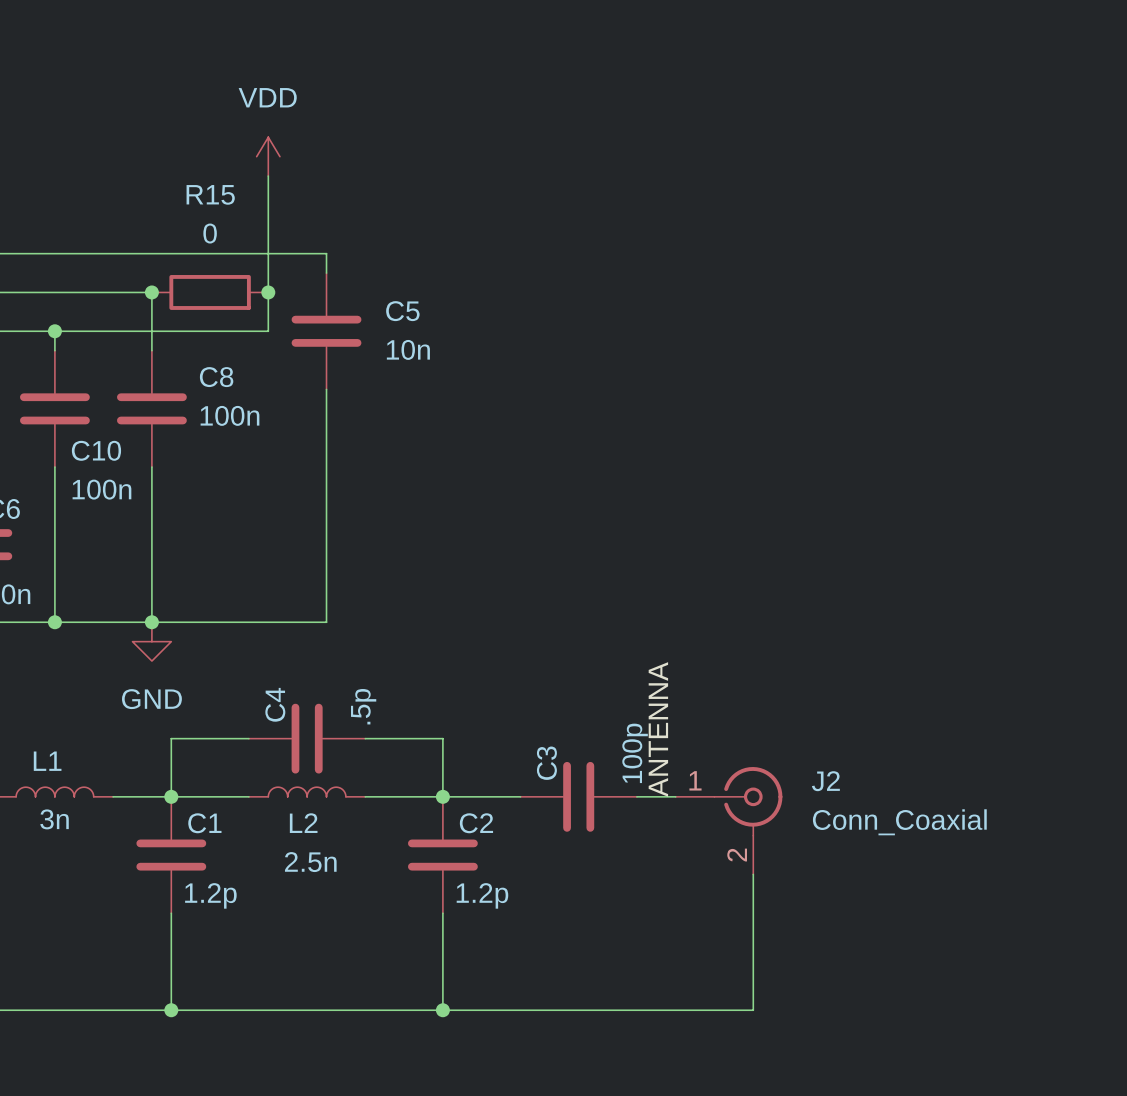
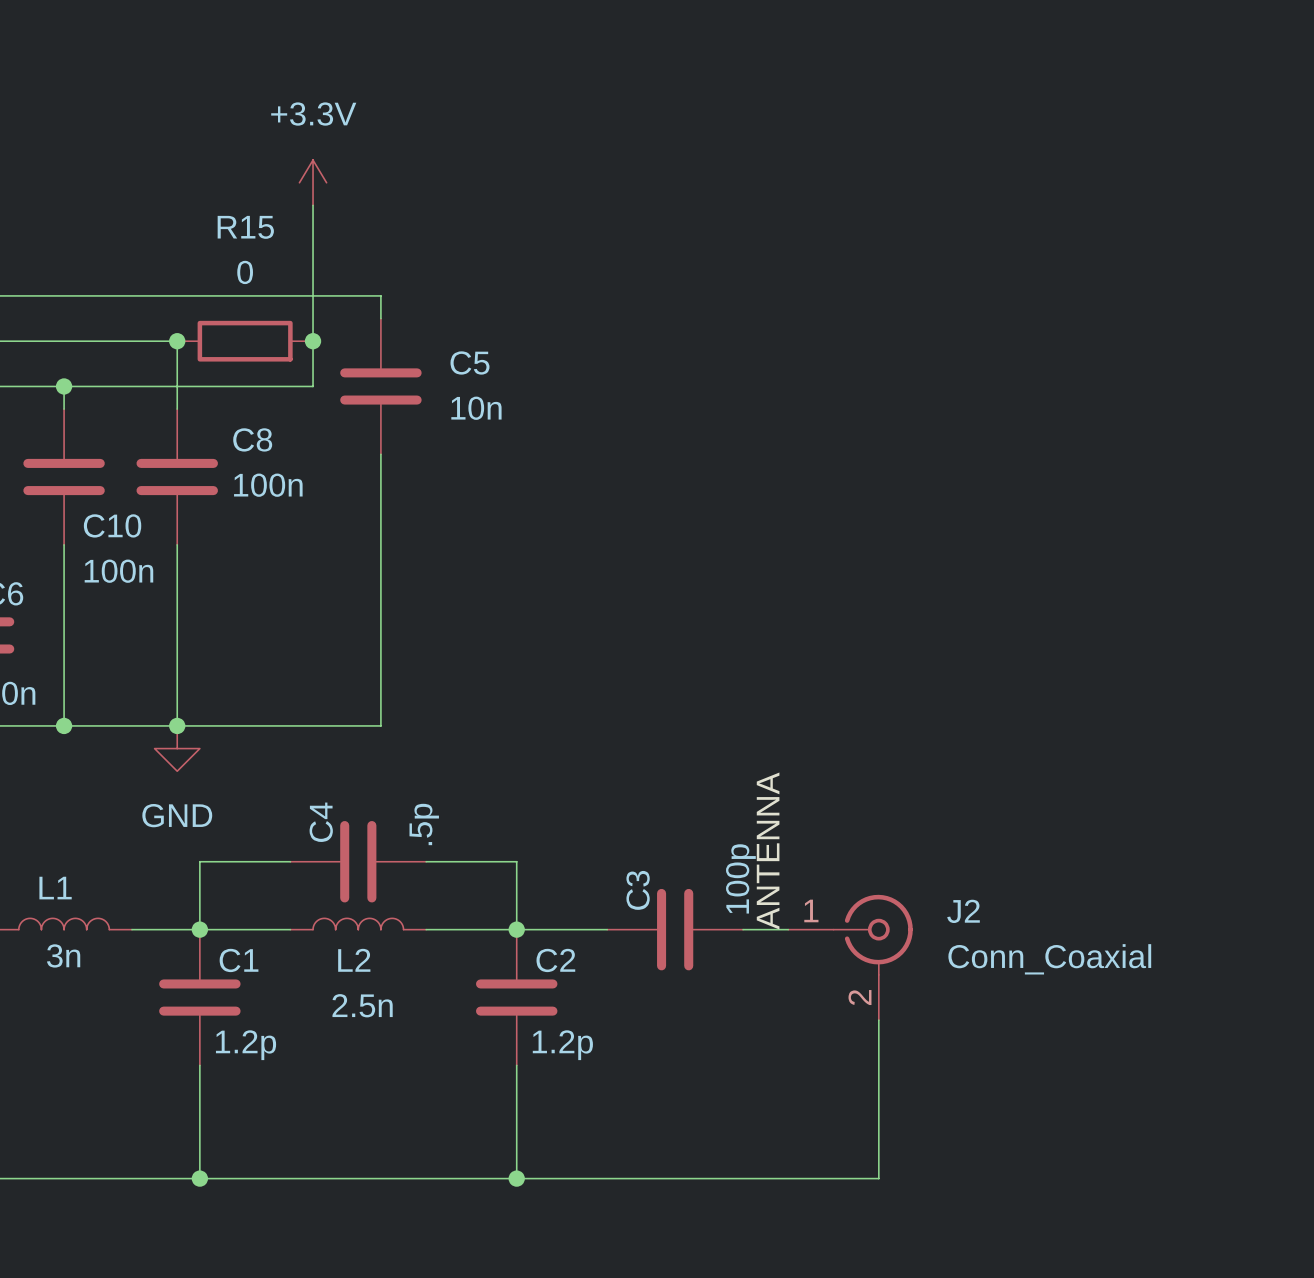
power symbol: VDD (268, 156) -> +3.3V (313, 182)

